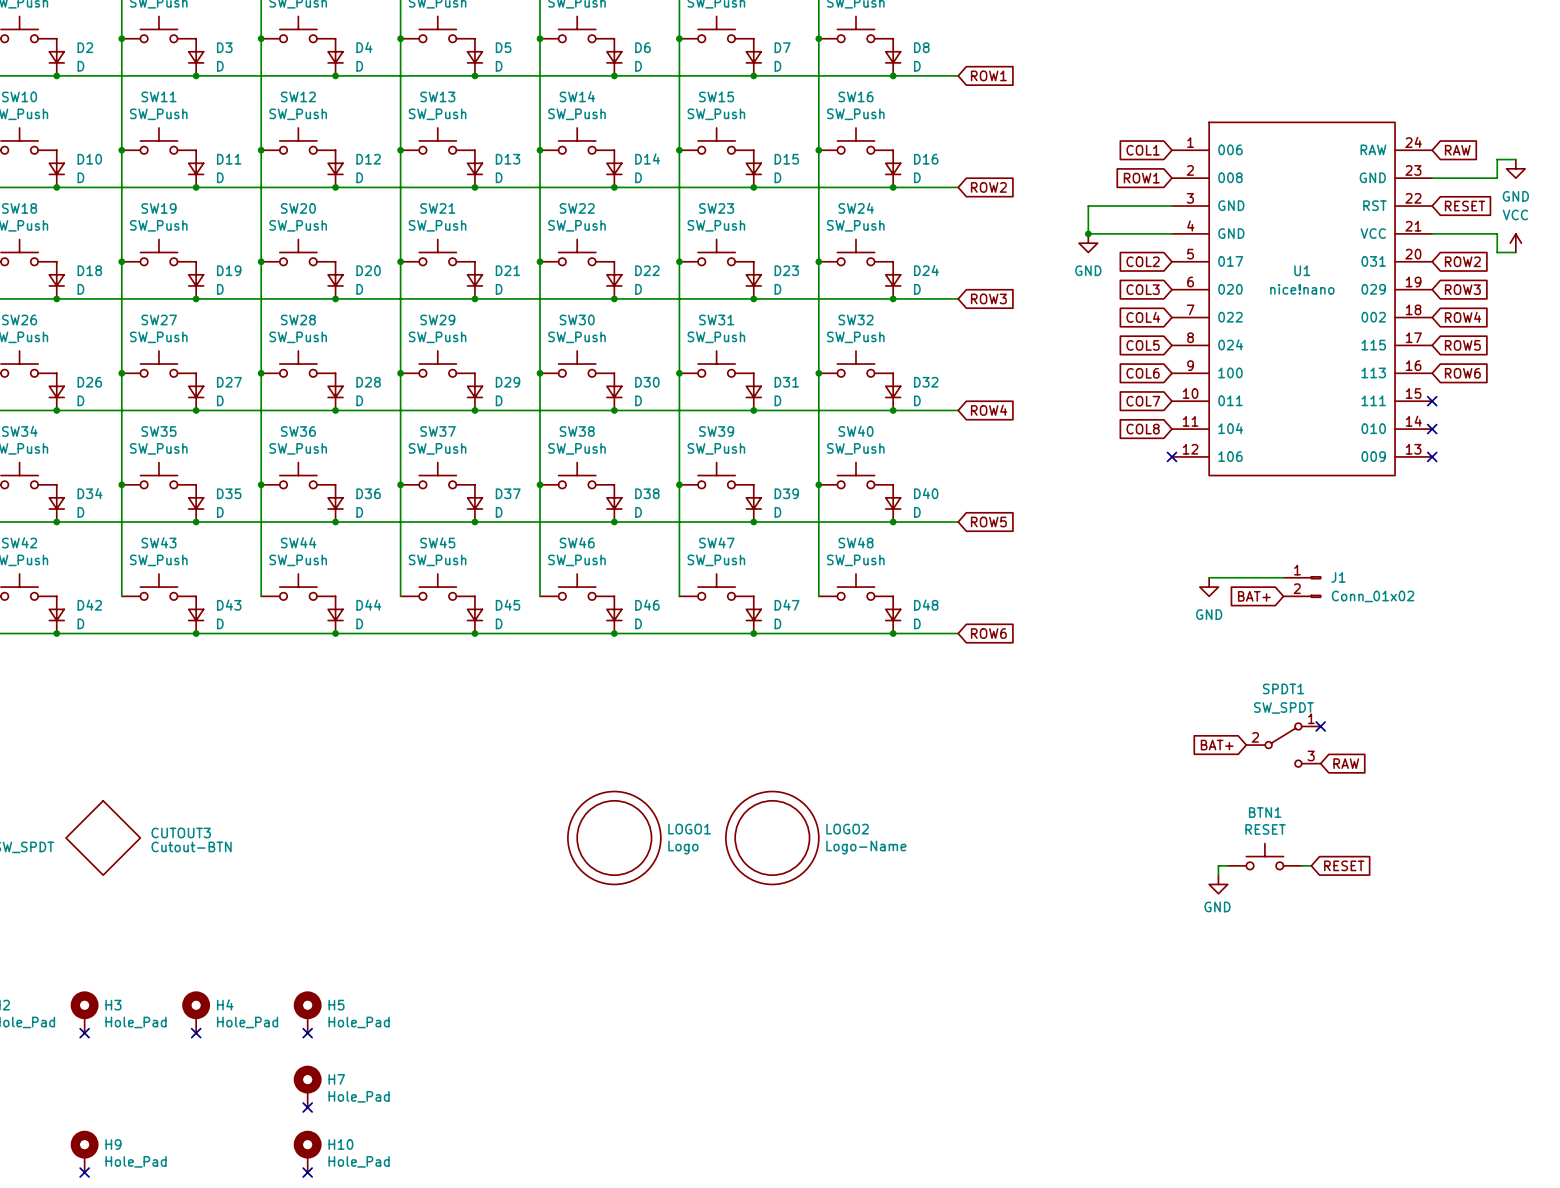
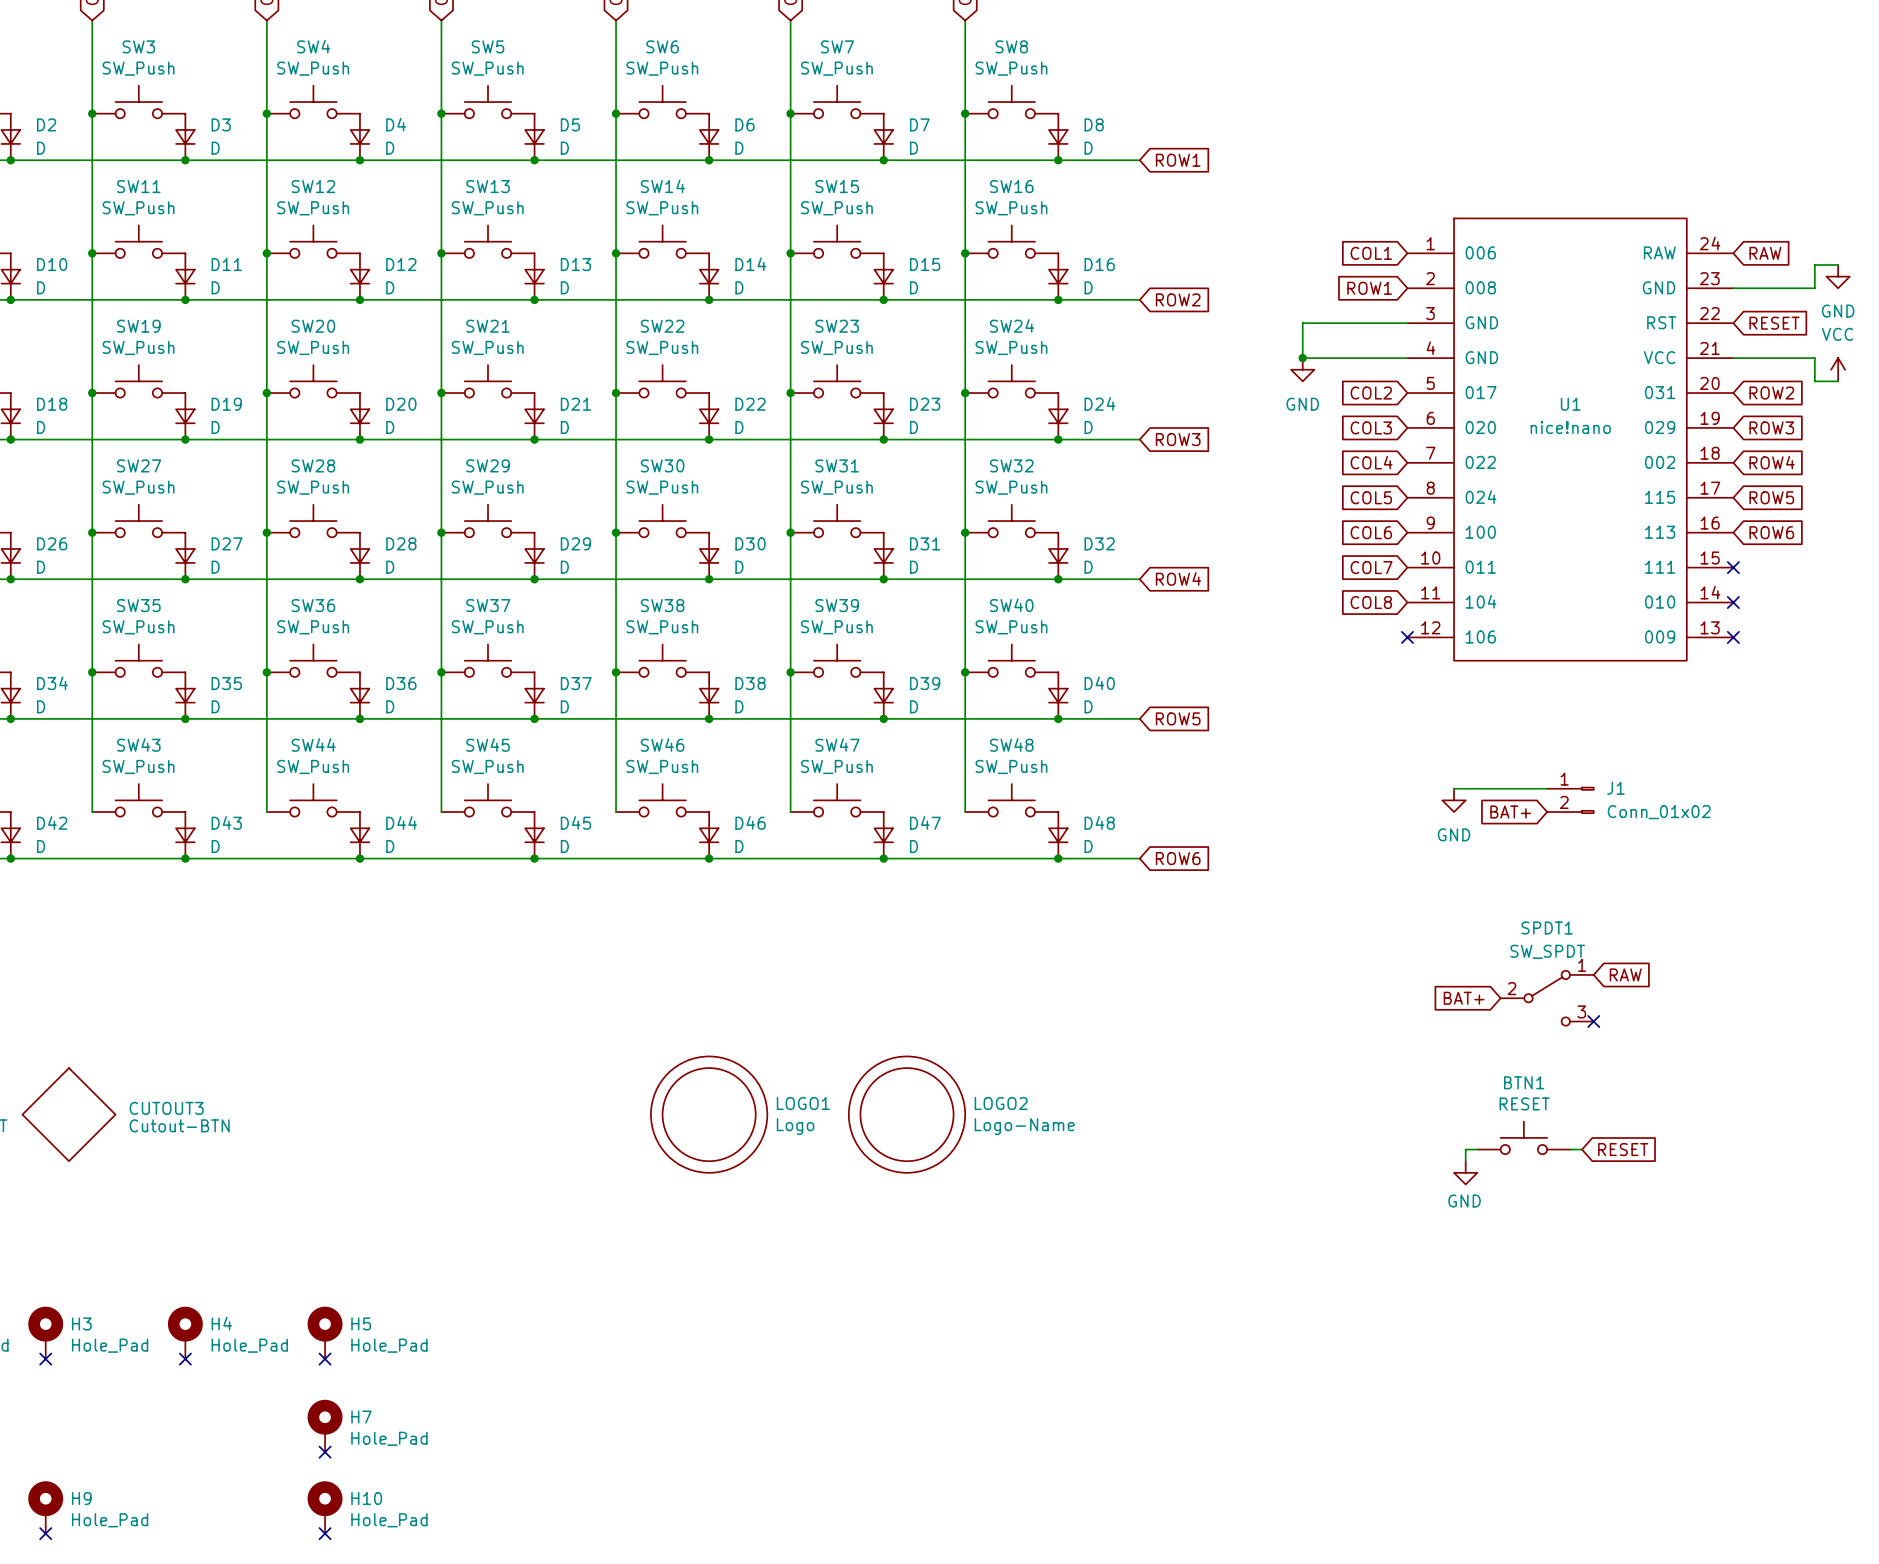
no-connect mark position: (1320, 726) -> (1593, 1021)
global label position: RAW (1346, 763) -> RAW (1625, 974)

